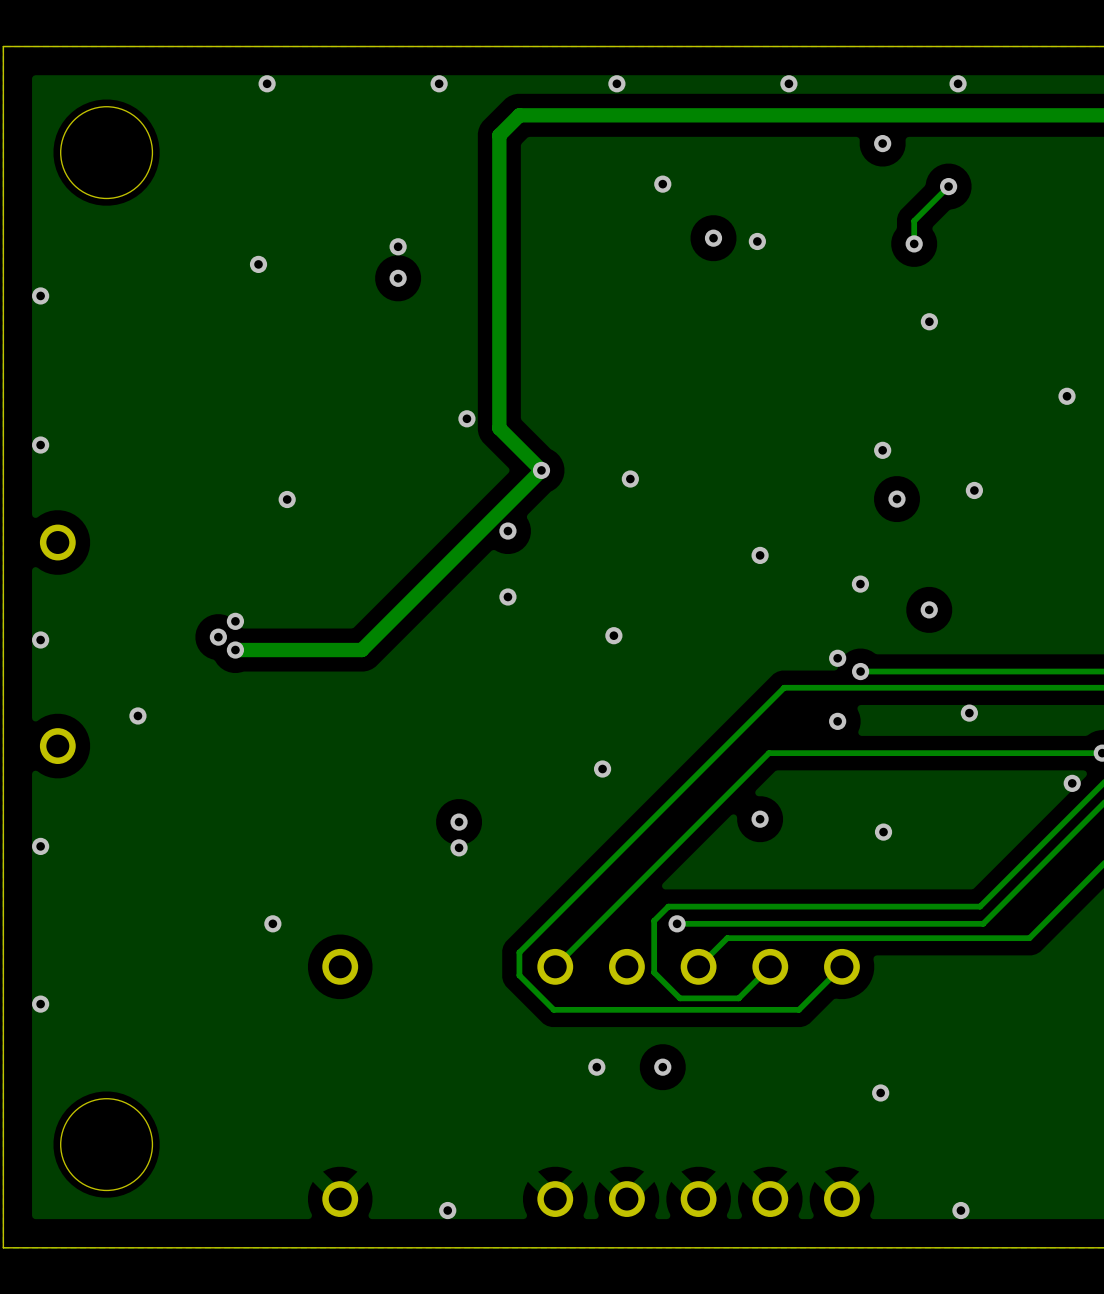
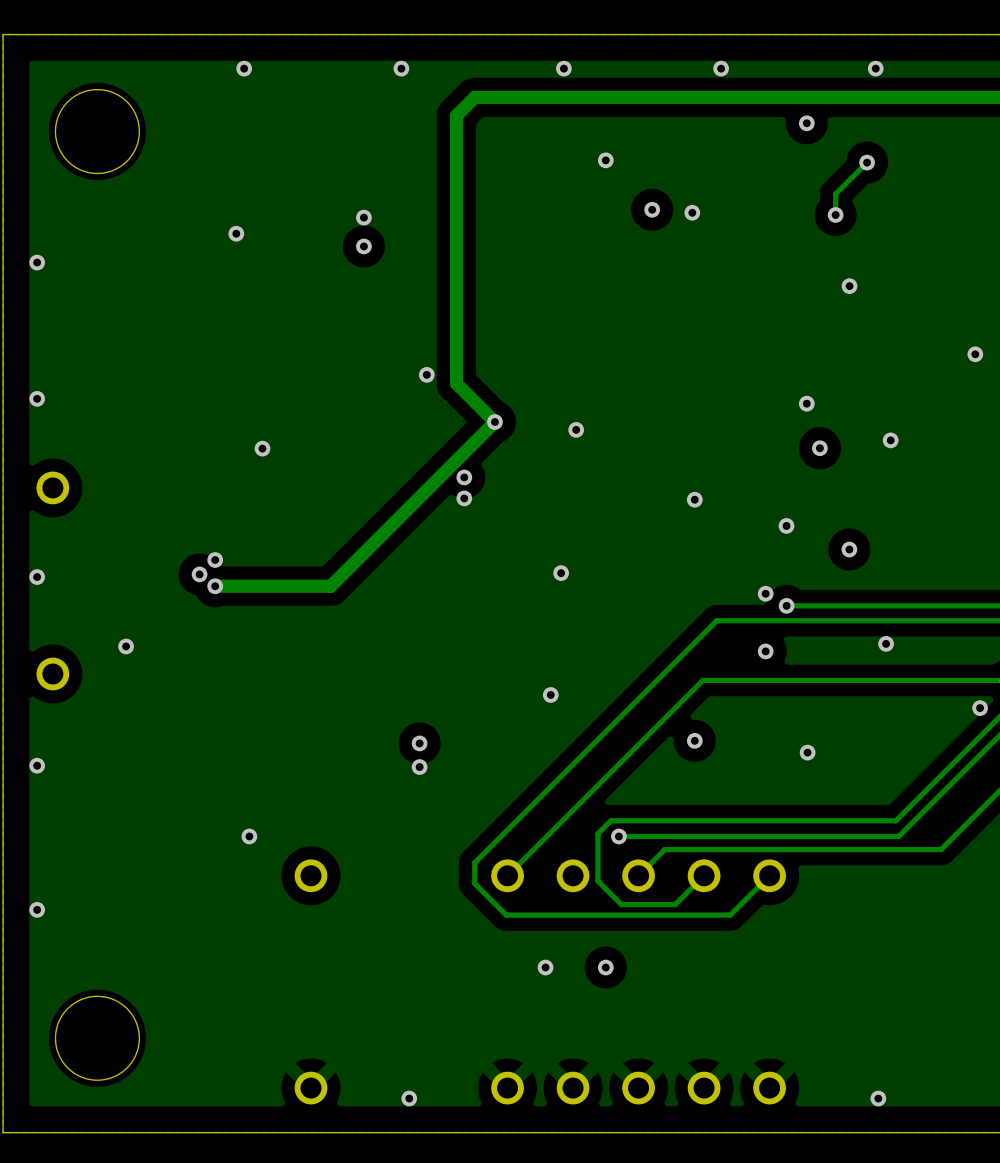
via position: (507, 596) -> (464, 498)
via: (880, 1092) -> none

